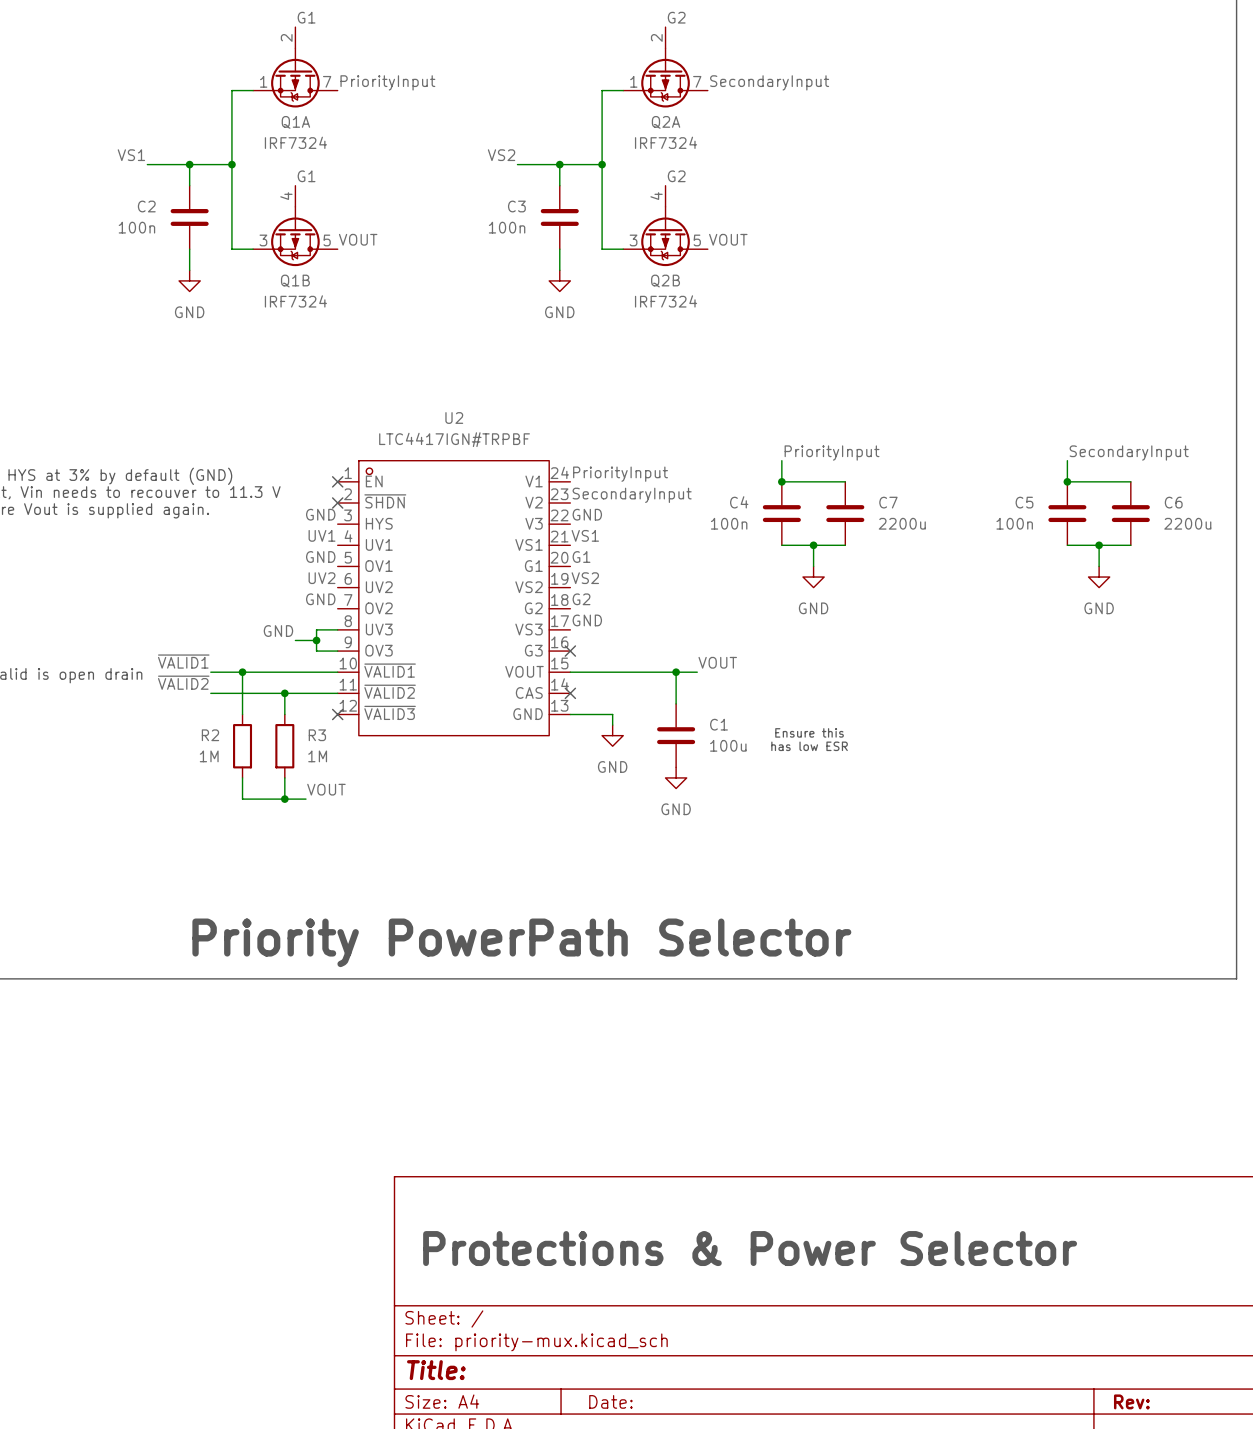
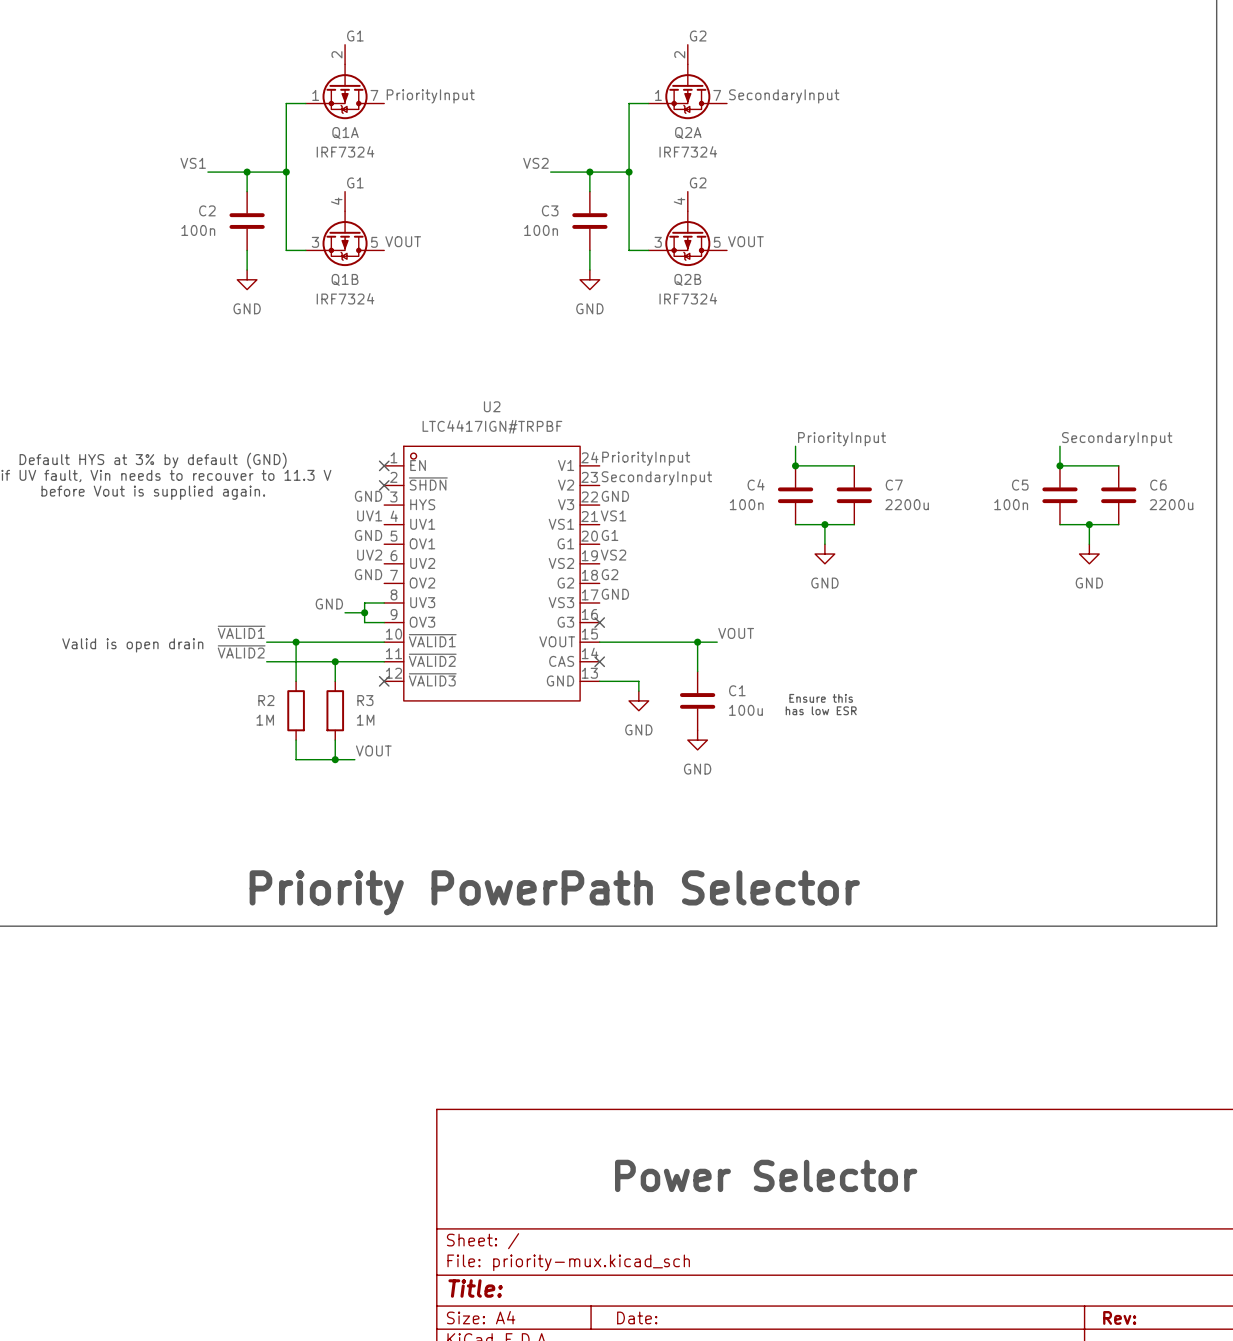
text: Protections & Power Selector (750, 1248) -> Power Selector (766, 1175)

